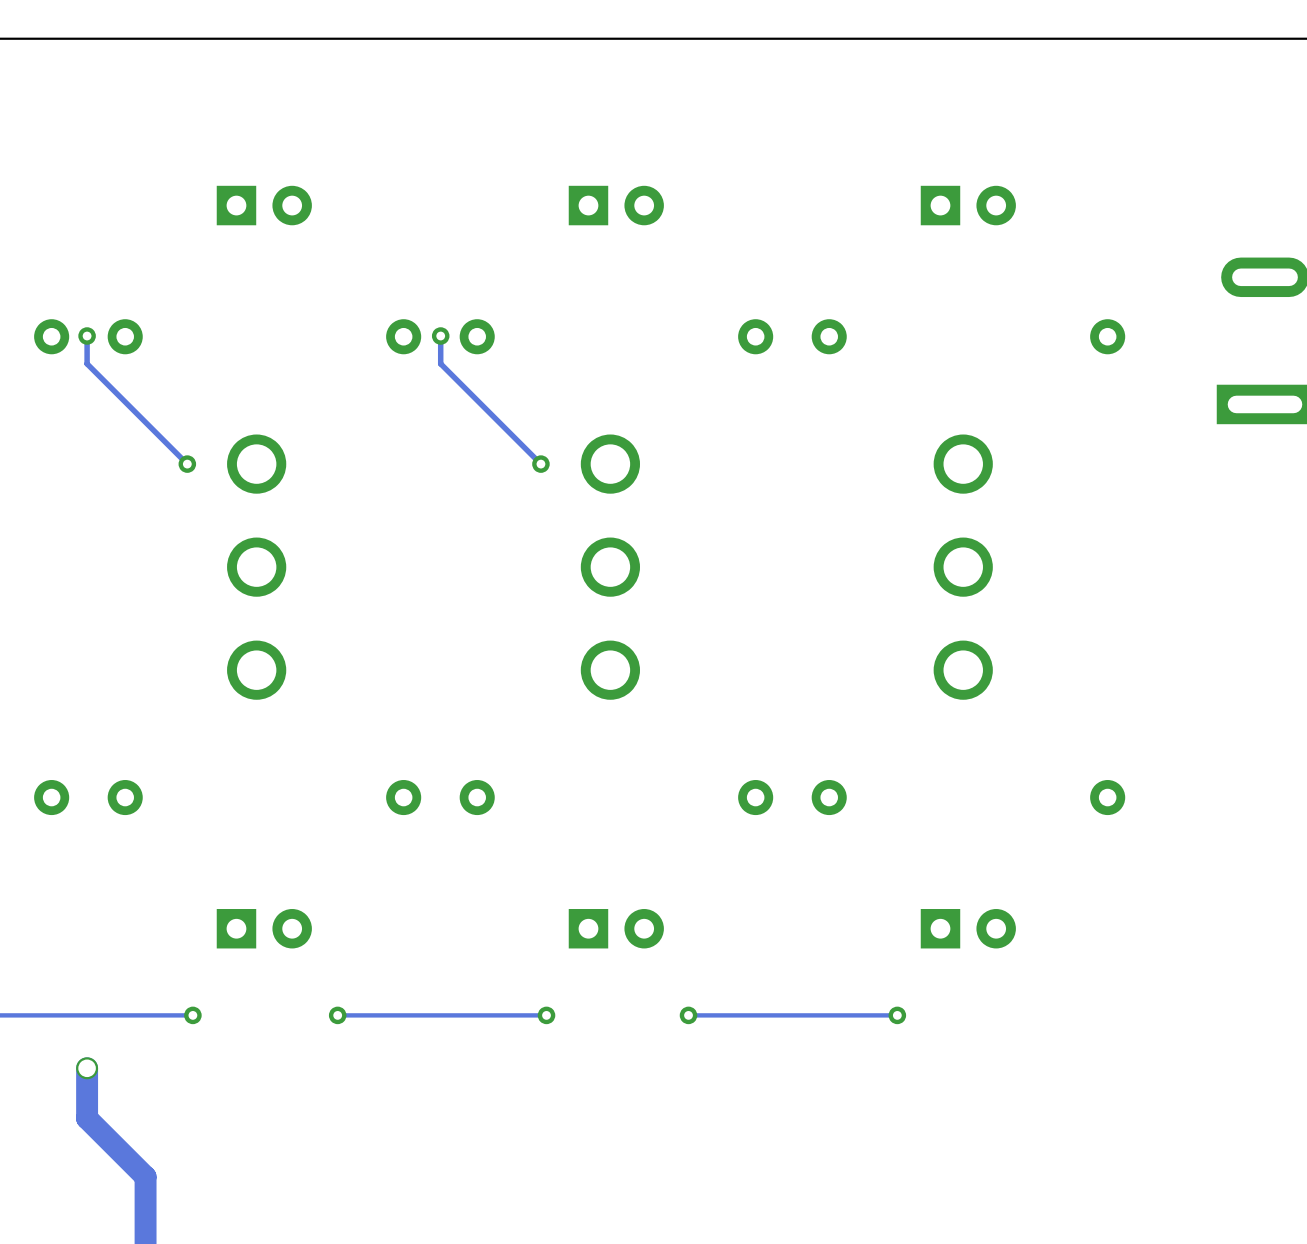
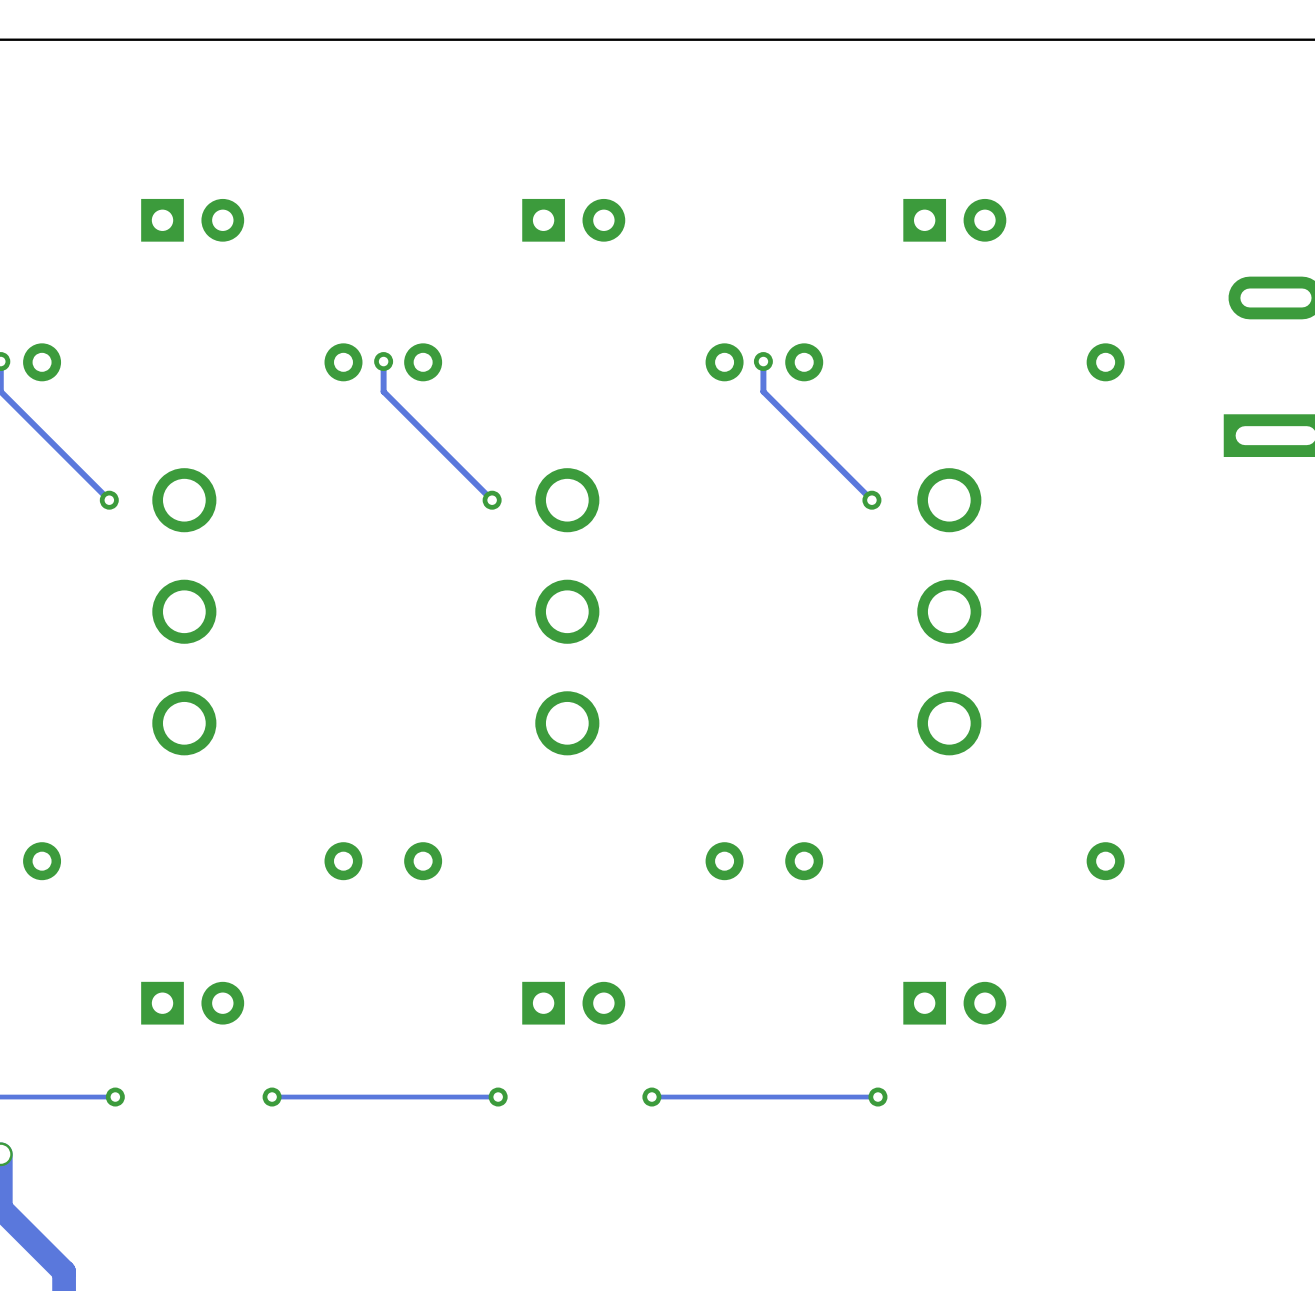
track: none -> (763, 361) (763, 391) (871, 500)
via: none -> (763, 361)
via: none -> (871, 500)

